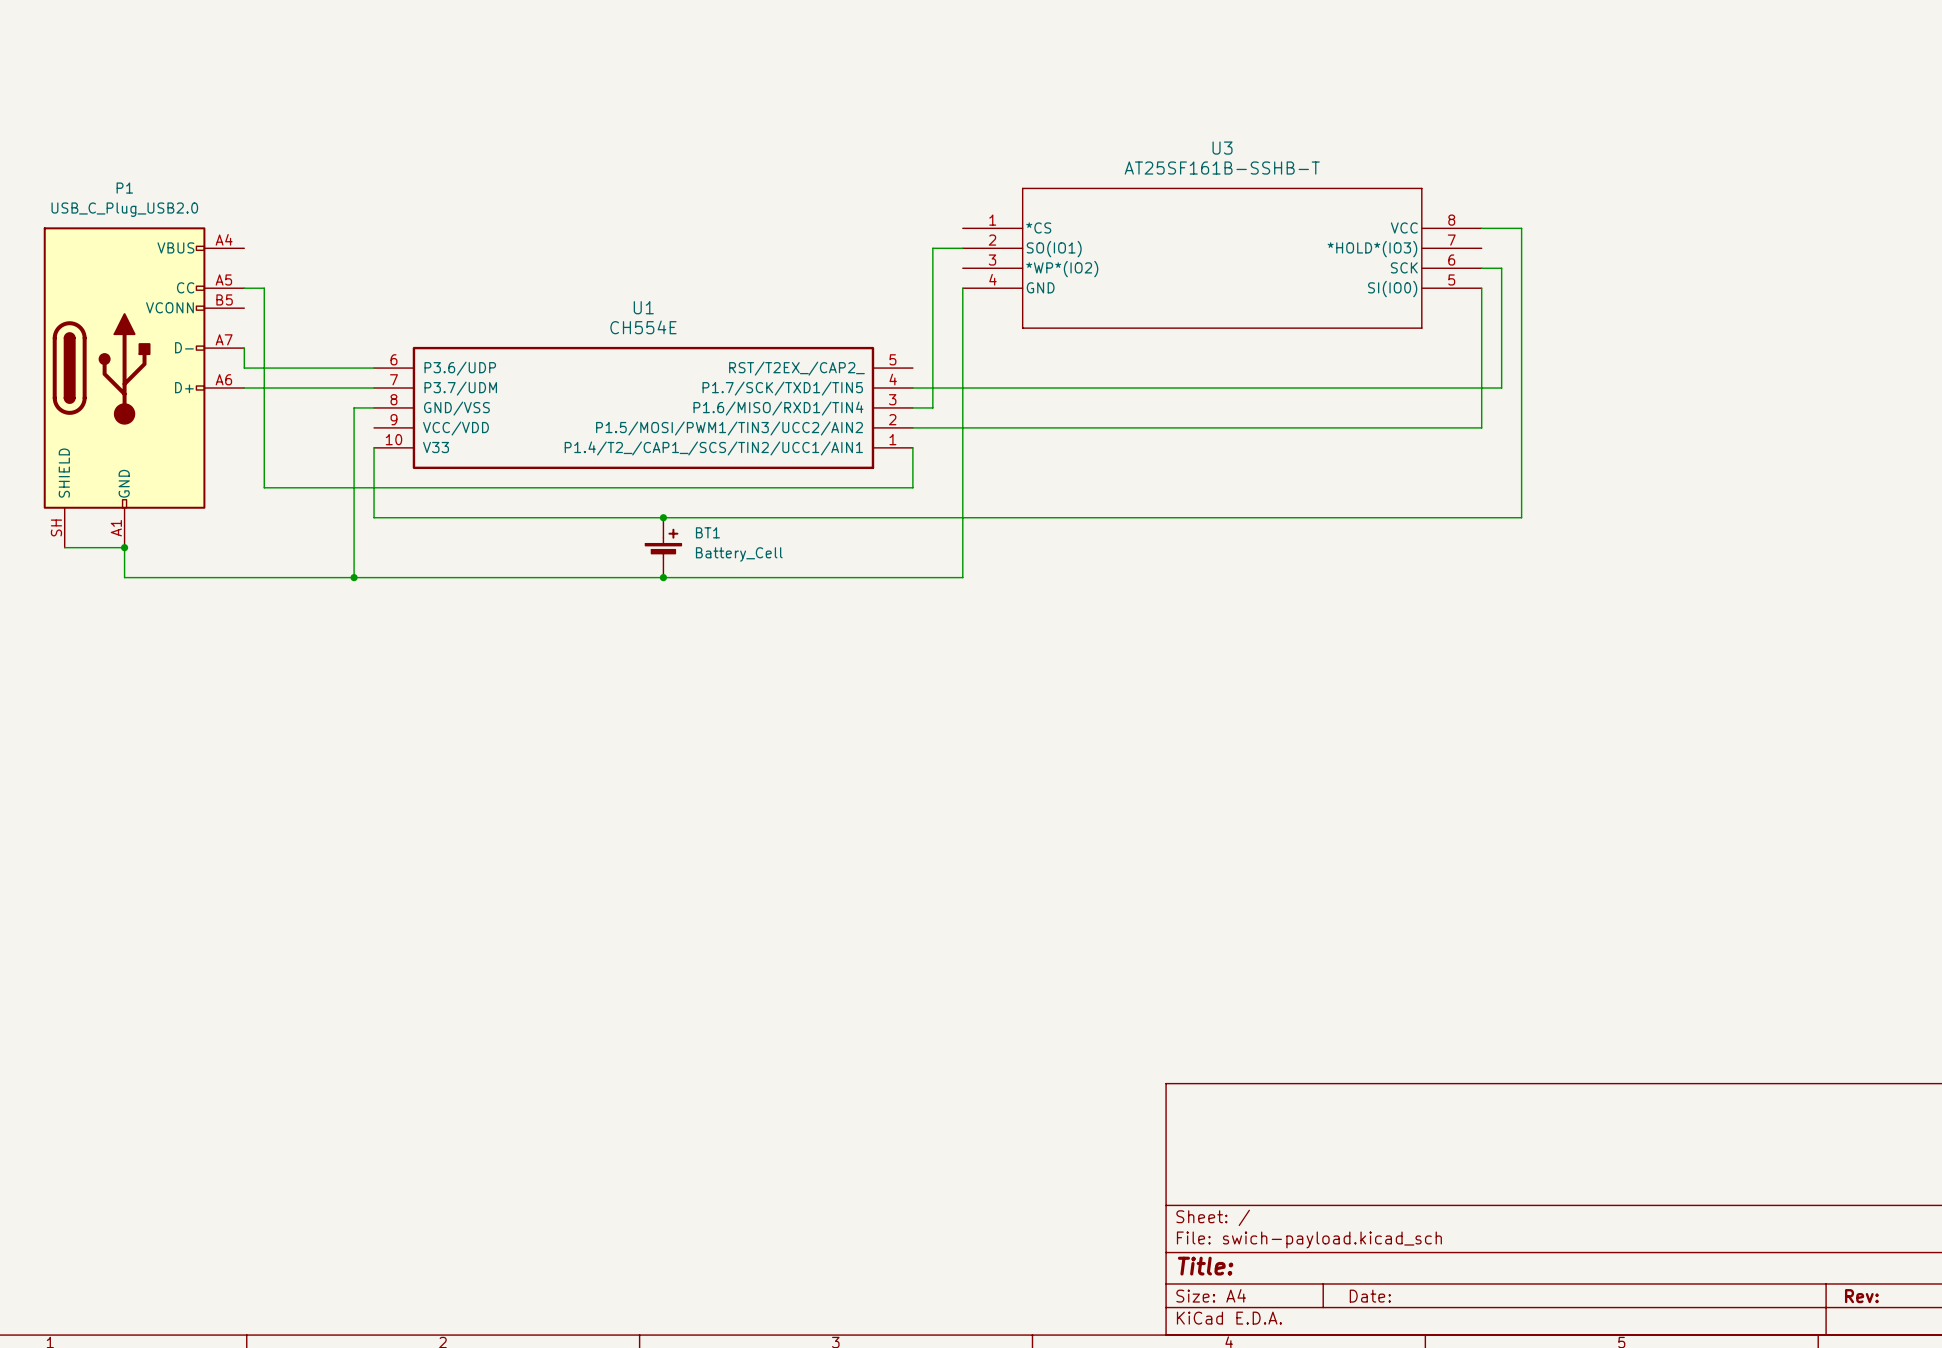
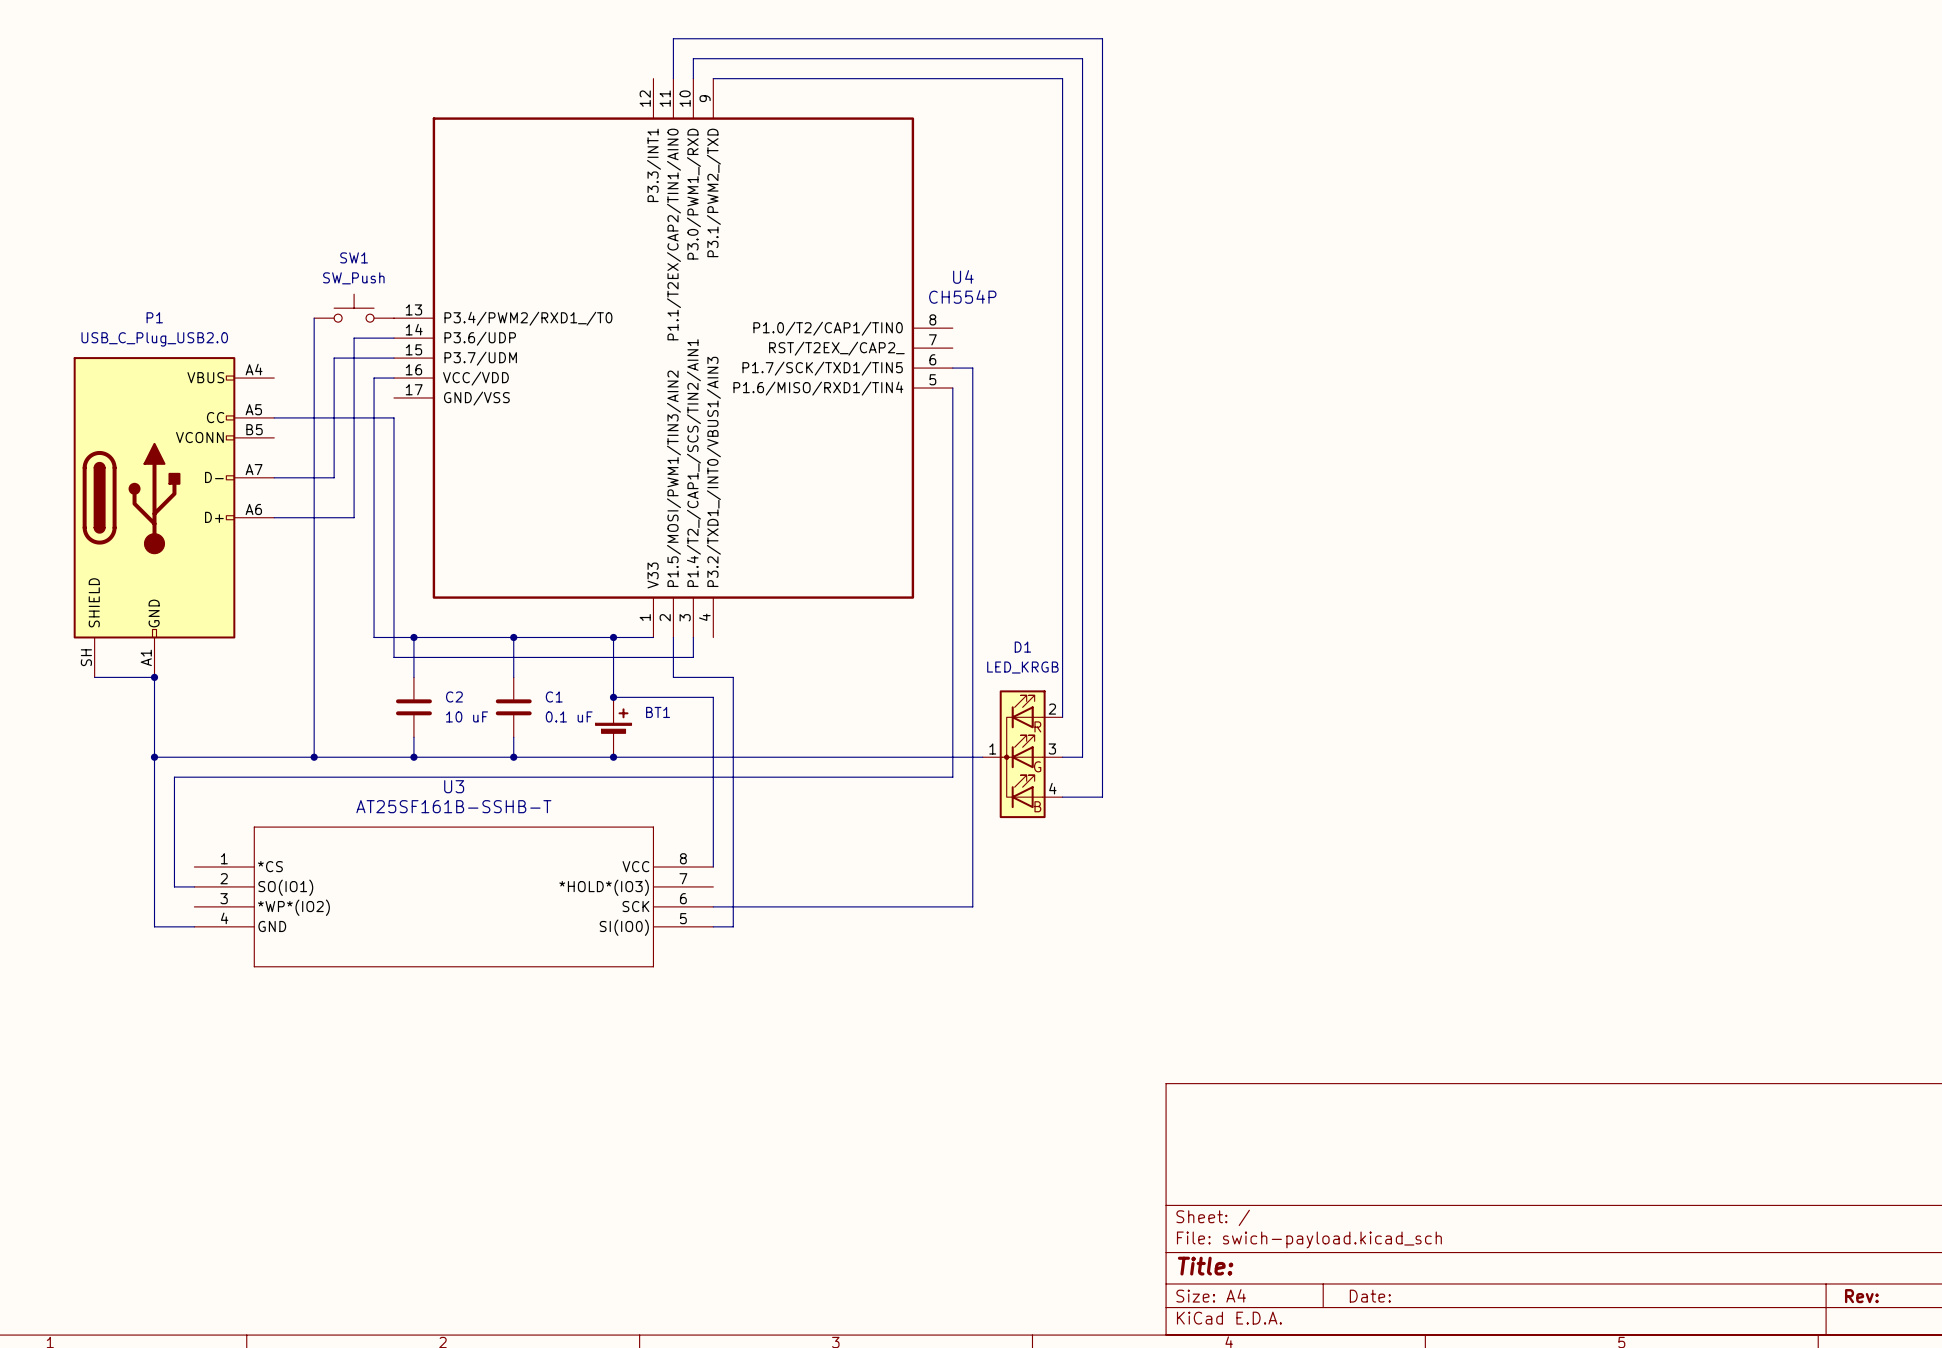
wire: none -> (673, 78) (673, 38) (1102, 38) (1102, 797) (1062, 797)
wire: none -> (693, 78) (693, 58) (1082, 58) (1082, 757) (1062, 757)
wire: none -> (713, 78) (1062, 78) (1062, 717)
wire: (1481, 228) (1521, 228) (1521, 517) (374, 517) -> (653, 637) (374, 637) (374, 517)
wire: (962, 248) (932, 248) (932, 407) (912, 407) -> none
U3 position: (1222, 258) -> (453, 896)
wire: (1481, 268) (1501, 268) (1501, 388) (912, 388) -> none
wire: (244, 288) (264, 288) (264, 487) (912, 487) (912, 447) -> none
wire: (962, 288) (962, 577) (124, 577) (124, 547) (64, 547) -> none
wire: (1481, 288) (1481, 427) (912, 427) -> none
SW1: none -> SW_Push (354, 308)
wire: none -> (314, 318) (314, 757)
wire: (244, 348) (244, 368) (374, 368) -> none
wire: none -> (393, 358) (334, 358) (334, 477) (274, 477)
U4: none -> CH554P (673, 358)
wire: none -> (952, 368) (972, 368) (972, 906) (713, 906)
wire: none -> (393, 378) (374, 378) (374, 447)
P1 position: (144, 387) -> (173, 517)
wire: (244, 388) (374, 388) -> none
wire: none -> (952, 388) (952, 777) (174, 777) (174, 886) (194, 886)
wire: (354, 407) (374, 407) -> (354, 407) (354, 338) (393, 338)
U1: CH554E (643, 407) -> none
wire: none -> (274, 417) (393, 417) (393, 657) (693, 657) (693, 637)
wire: (354, 517) (354, 577) -> (354, 517) (274, 517)
junction: (663, 517) -> none
junction: (124, 547) -> none
BT1 position: (663, 547) -> (613, 727)
BT1 value: Battery_Cell (739, 554) -> none
junction: (354, 577) -> none
junction: (663, 577) -> none
wire: none -> (413, 637) (413, 677)
junction: none -> (413, 637)
wire: none -> (513, 637) (513, 677)
junction: none -> (513, 637)
wire: none -> (613, 637) (613, 697) (713, 697) (713, 866)
junction: none -> (613, 637)
wire: none -> (673, 637) (673, 677) (733, 677) (733, 926) (713, 926)
wire: none -> (94, 677) (154, 677) (154, 926) (194, 926)
junction: none -> (154, 677)
junction: none -> (613, 697)
C2: none -> 10 uF (413, 707)
C1: none -> 0.1 uF (513, 707)
wire: none -> (413, 737) (413, 757)
wire: none -> (513, 737) (513, 757)
D1: none -> LED_KRGB (1022, 754)
wire: none -> (154, 757) (982, 757)
junction: none -> (154, 757)
junction: none -> (314, 757)
junction: none -> (413, 757)
junction: none -> (513, 757)
junction: none -> (613, 757)

